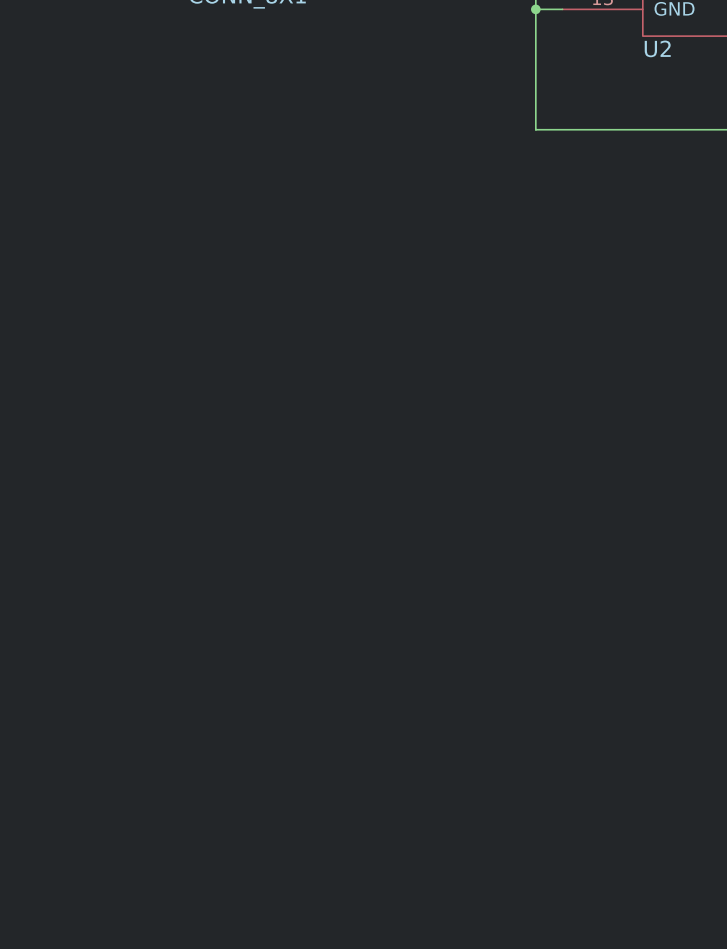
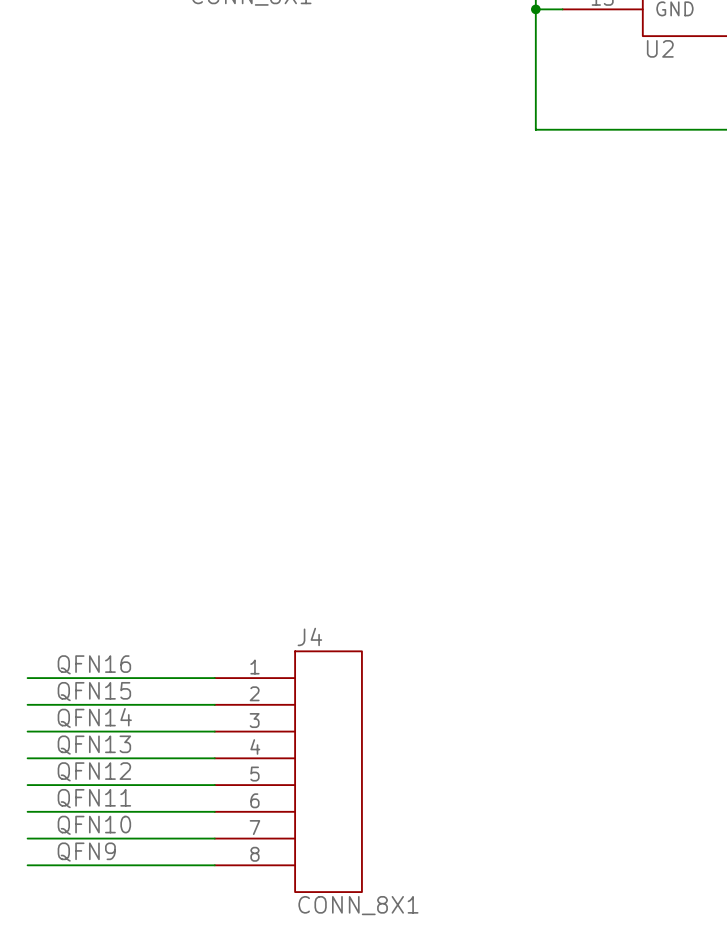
label: none -> QFN16 (94, 664)
wire: none -> (27, 678) (214, 678)
label: none -> QFN15 (94, 691)
wire: none -> (27, 704) (214, 704)
label: none -> QFN14 (94, 717)
wire: none -> (27, 731) (214, 731)
label: none -> QFN13 (94, 745)
wire: none -> (27, 758) (214, 758)
J4: none -> CONN_8X1 (288, 771)
label: none -> QFN12 (94, 771)
wire: none -> (27, 785) (214, 785)
label: none -> QFN11 (94, 798)
wire: none -> (27, 811) (214, 811)
label: none -> QFN10 (94, 825)
wire: none -> (27, 838) (214, 838)
label: none -> QFN9 (86, 852)
wire: none -> (27, 865) (214, 865)

